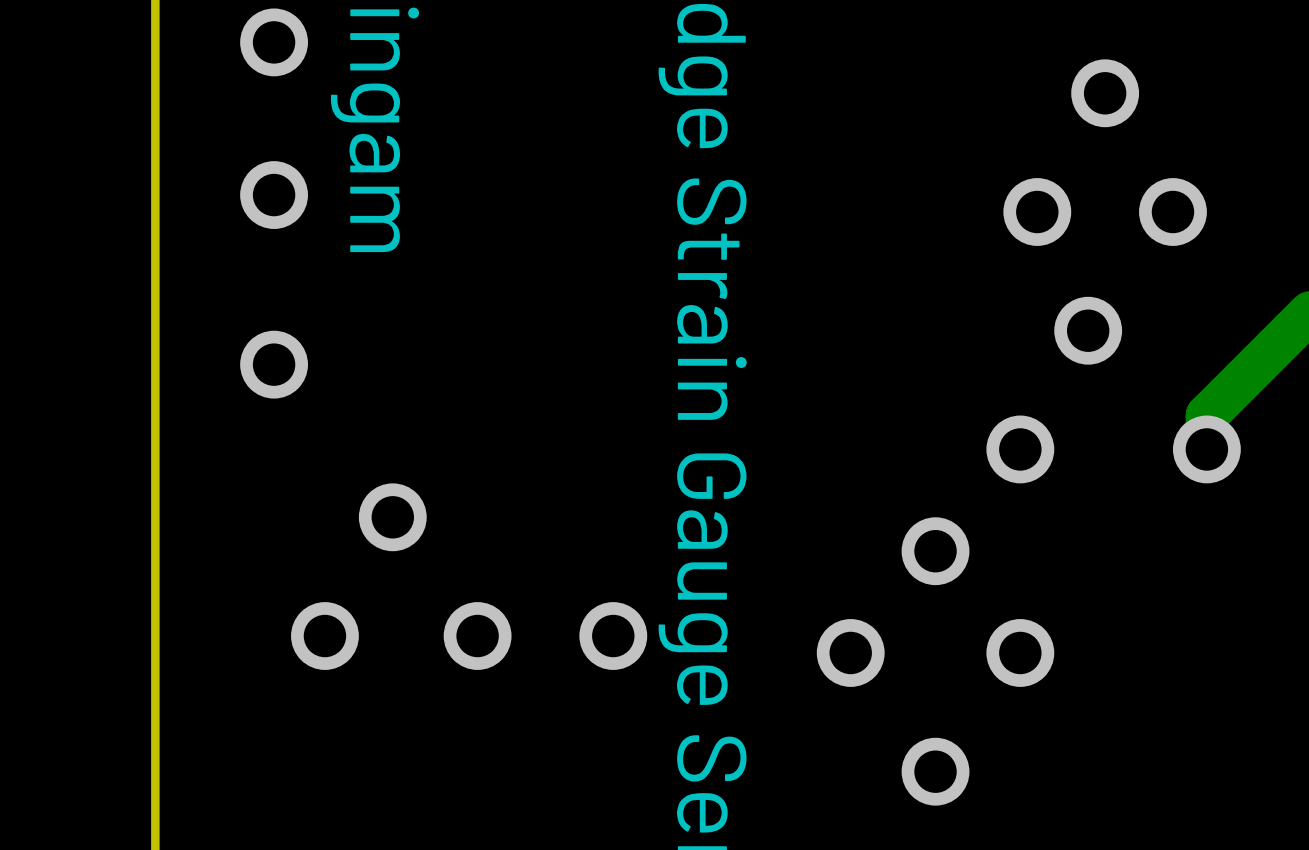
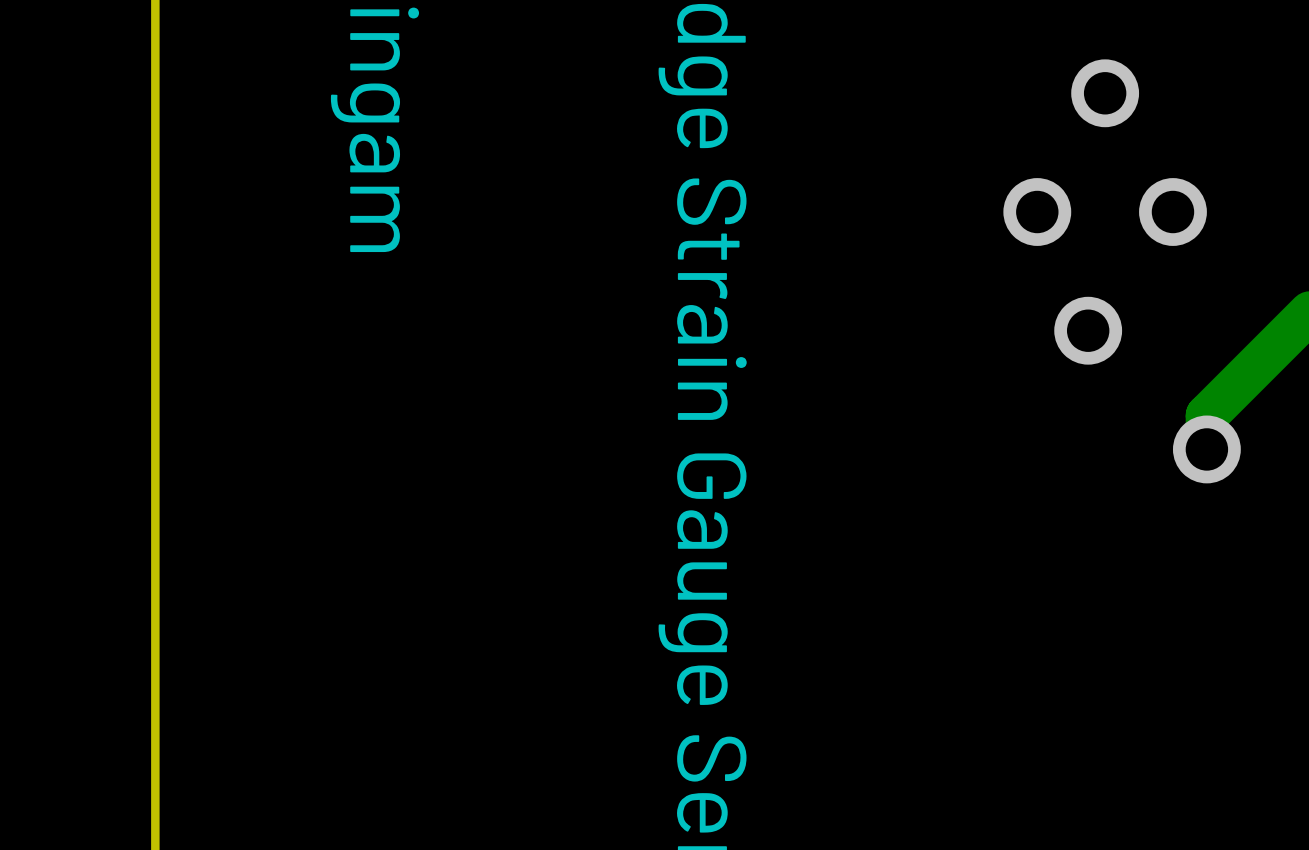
via: (274, 42) -> none
via: (274, 195) -> none
via: (274, 364) -> none
via: (1020, 449) -> none
via: (392, 517) -> none
via: (935, 551) -> none
via: (324, 636) -> none
via: (477, 636) -> none
via: (613, 636) -> none
via: (850, 652) -> none
via: (1020, 652) -> none
via: (935, 771) -> none

